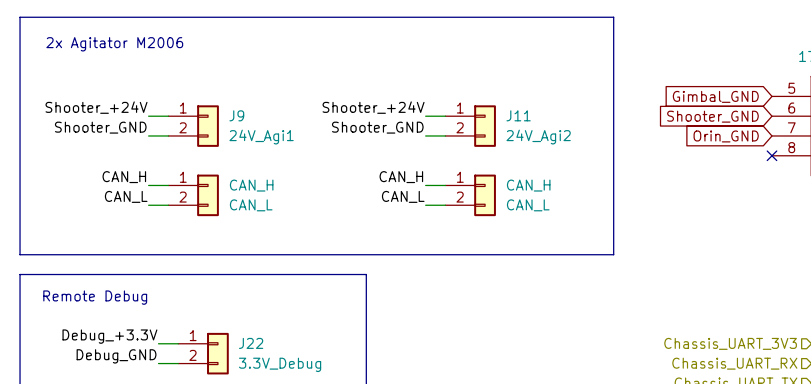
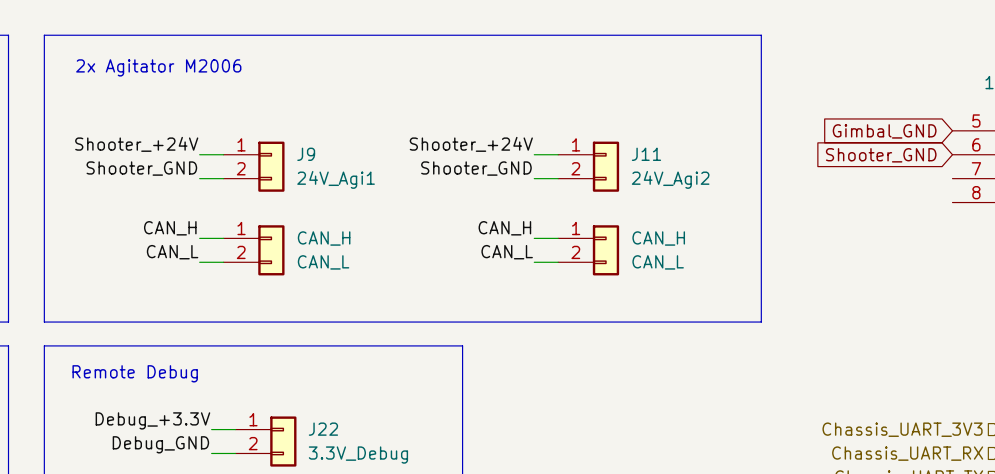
global label: Orin_GND (726, 136) -> none
no-connect mark: (771, 155) -> none

